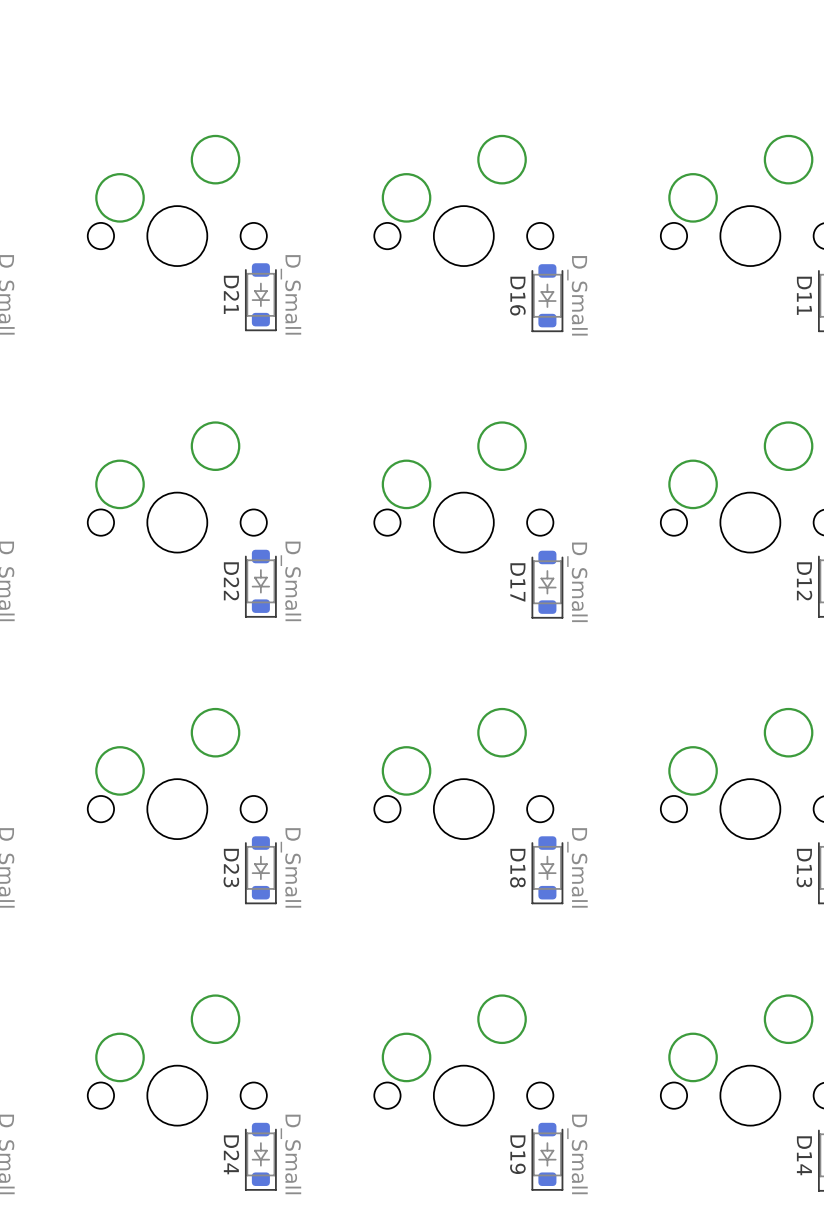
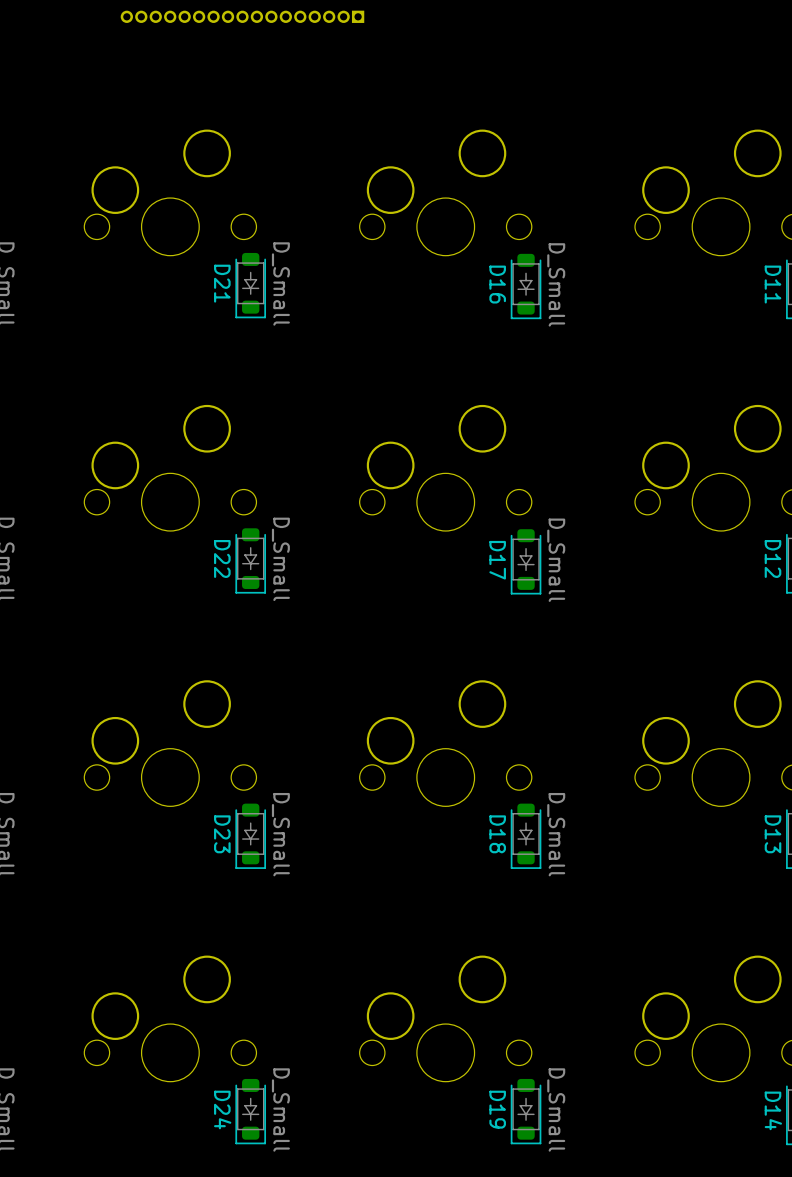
part: none -> (242, 16)

